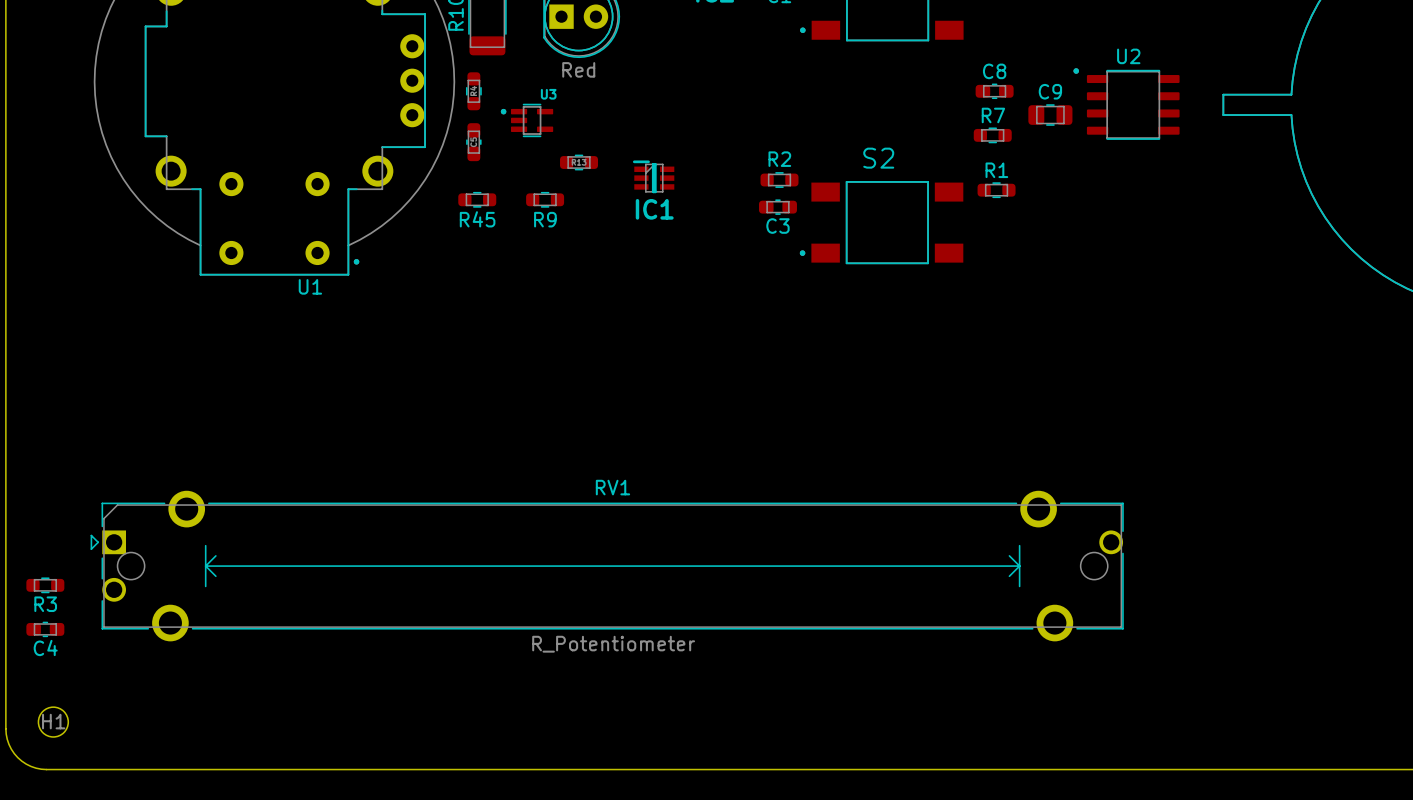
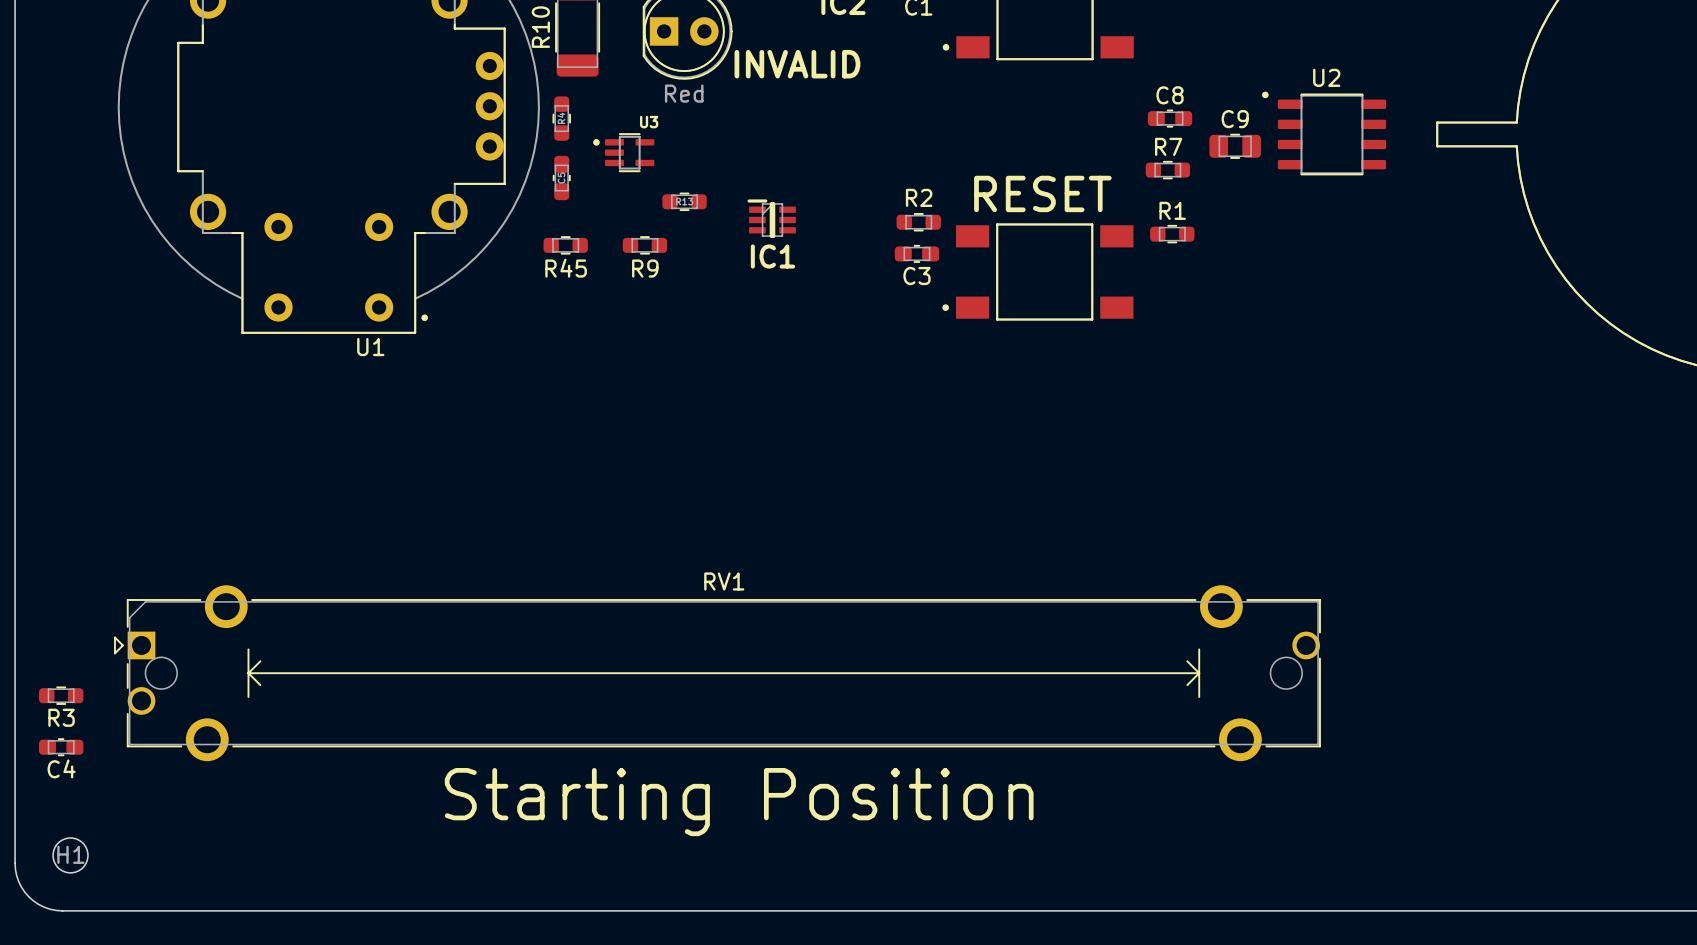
text: none -> INVALID (797, 64)
text: none -> RESET (1042, 193)
S2 name: S2 (878, 158) -> none
RV1 value: R_Potentiometer (613, 644) -> none
text: none -> Starting Position (739, 802)

